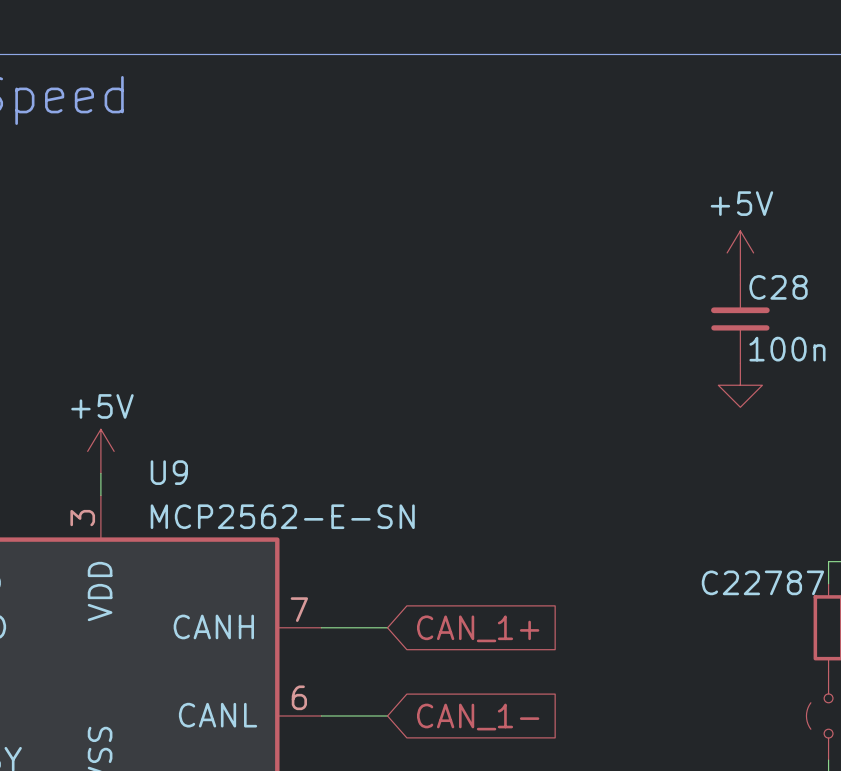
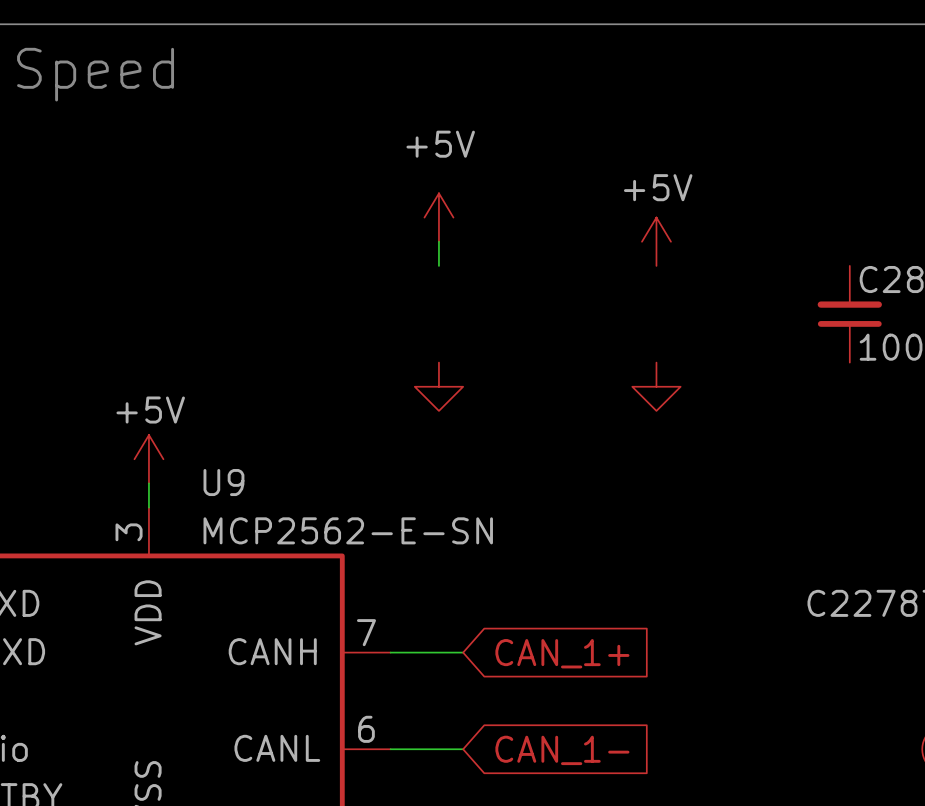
power symbol: none -> +5V (438, 217)
wire: none -> (438, 241) (438, 265)
power symbol position: +5V (740, 252) -> +5V (656, 241)
power symbol: none -> (438, 386)
power symbol position: (740, 385) -> (656, 386)

